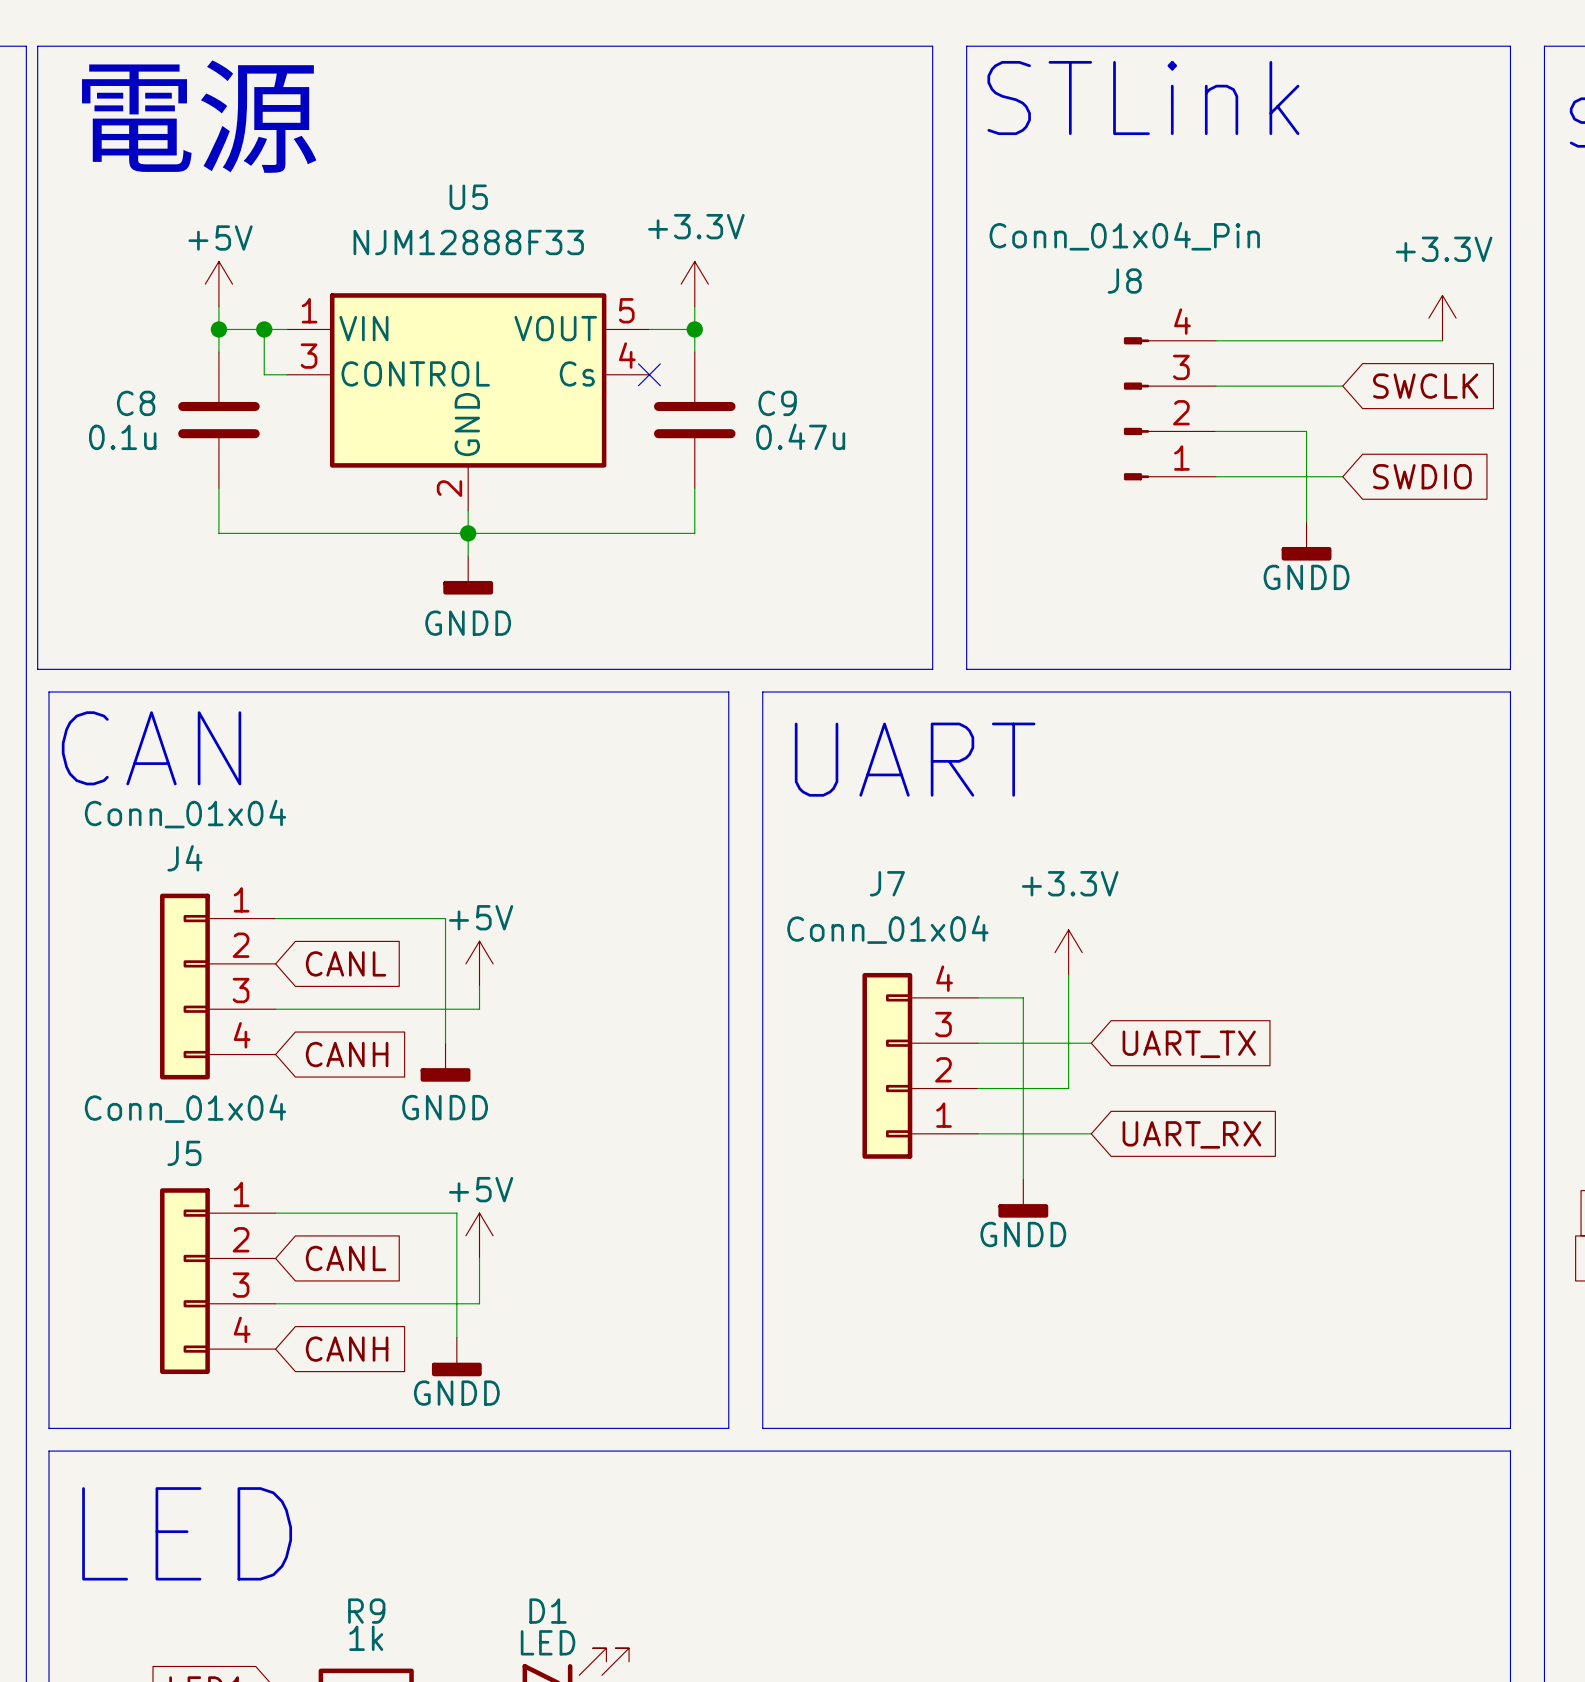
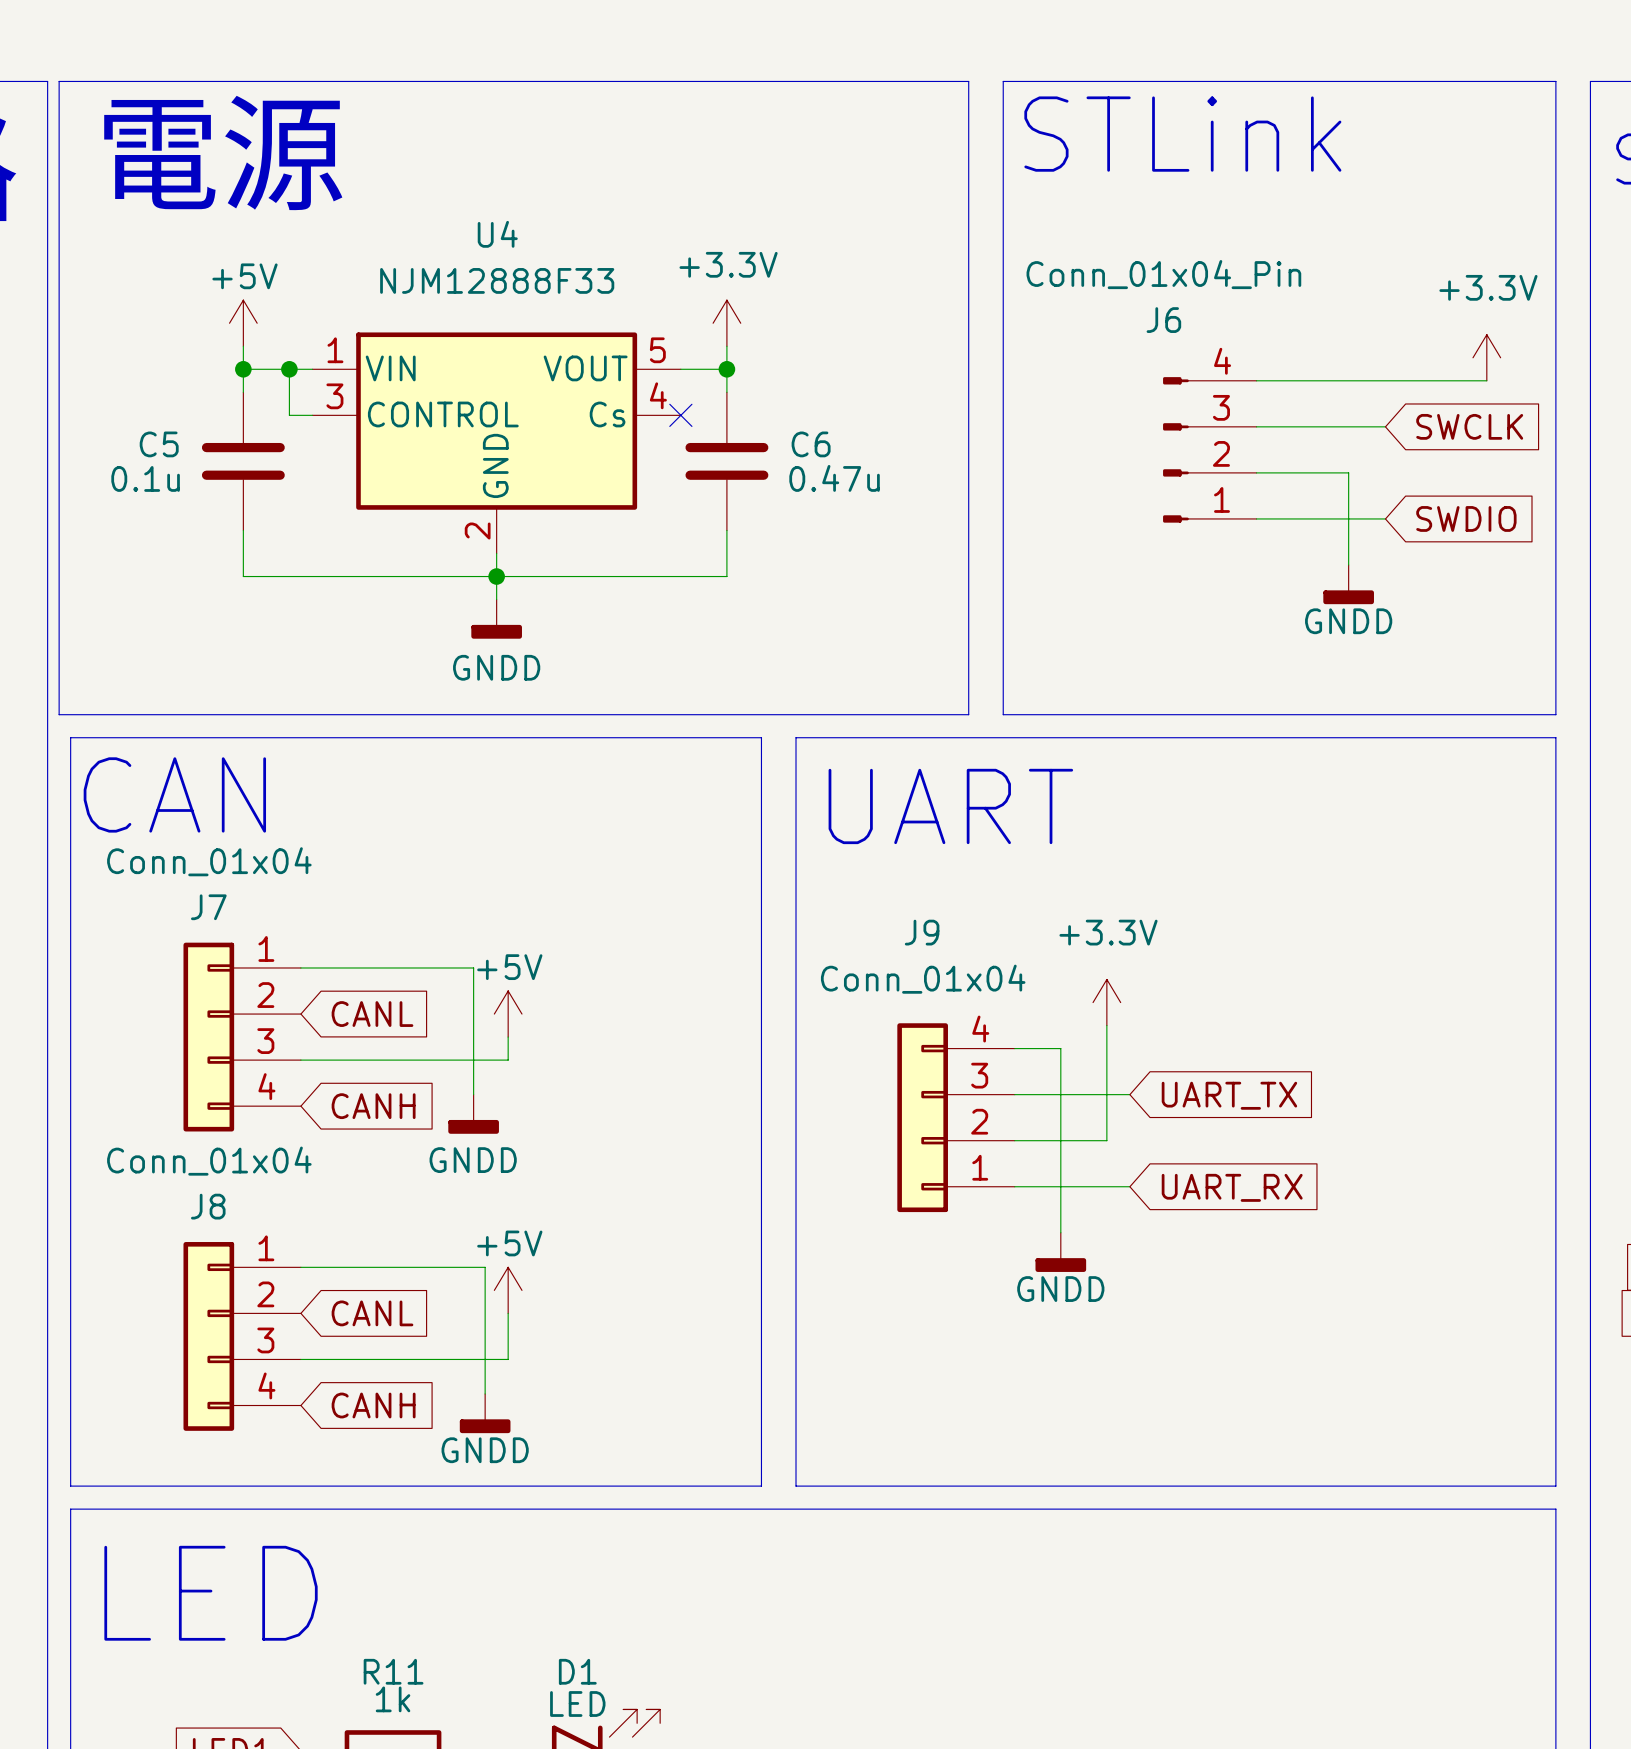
U5 name: U5 (468, 197) -> U4 (497, 234)
J8 name: J8 (1124, 281) -> J6 (1163, 320)
C8 name: C8 (136, 403) -> C5 (159, 444)
C9 name: C9 (777, 403) -> C6 (811, 444)
J4 name: J4 (184, 858) -> J7 (208, 907)
J7 name: J7 (887, 883) -> J9 (922, 932)
J5 name: J5 (184, 1153) -> J8 (208, 1206)
R9 name: R9 (366, 1611) -> R11 (393, 1671)

